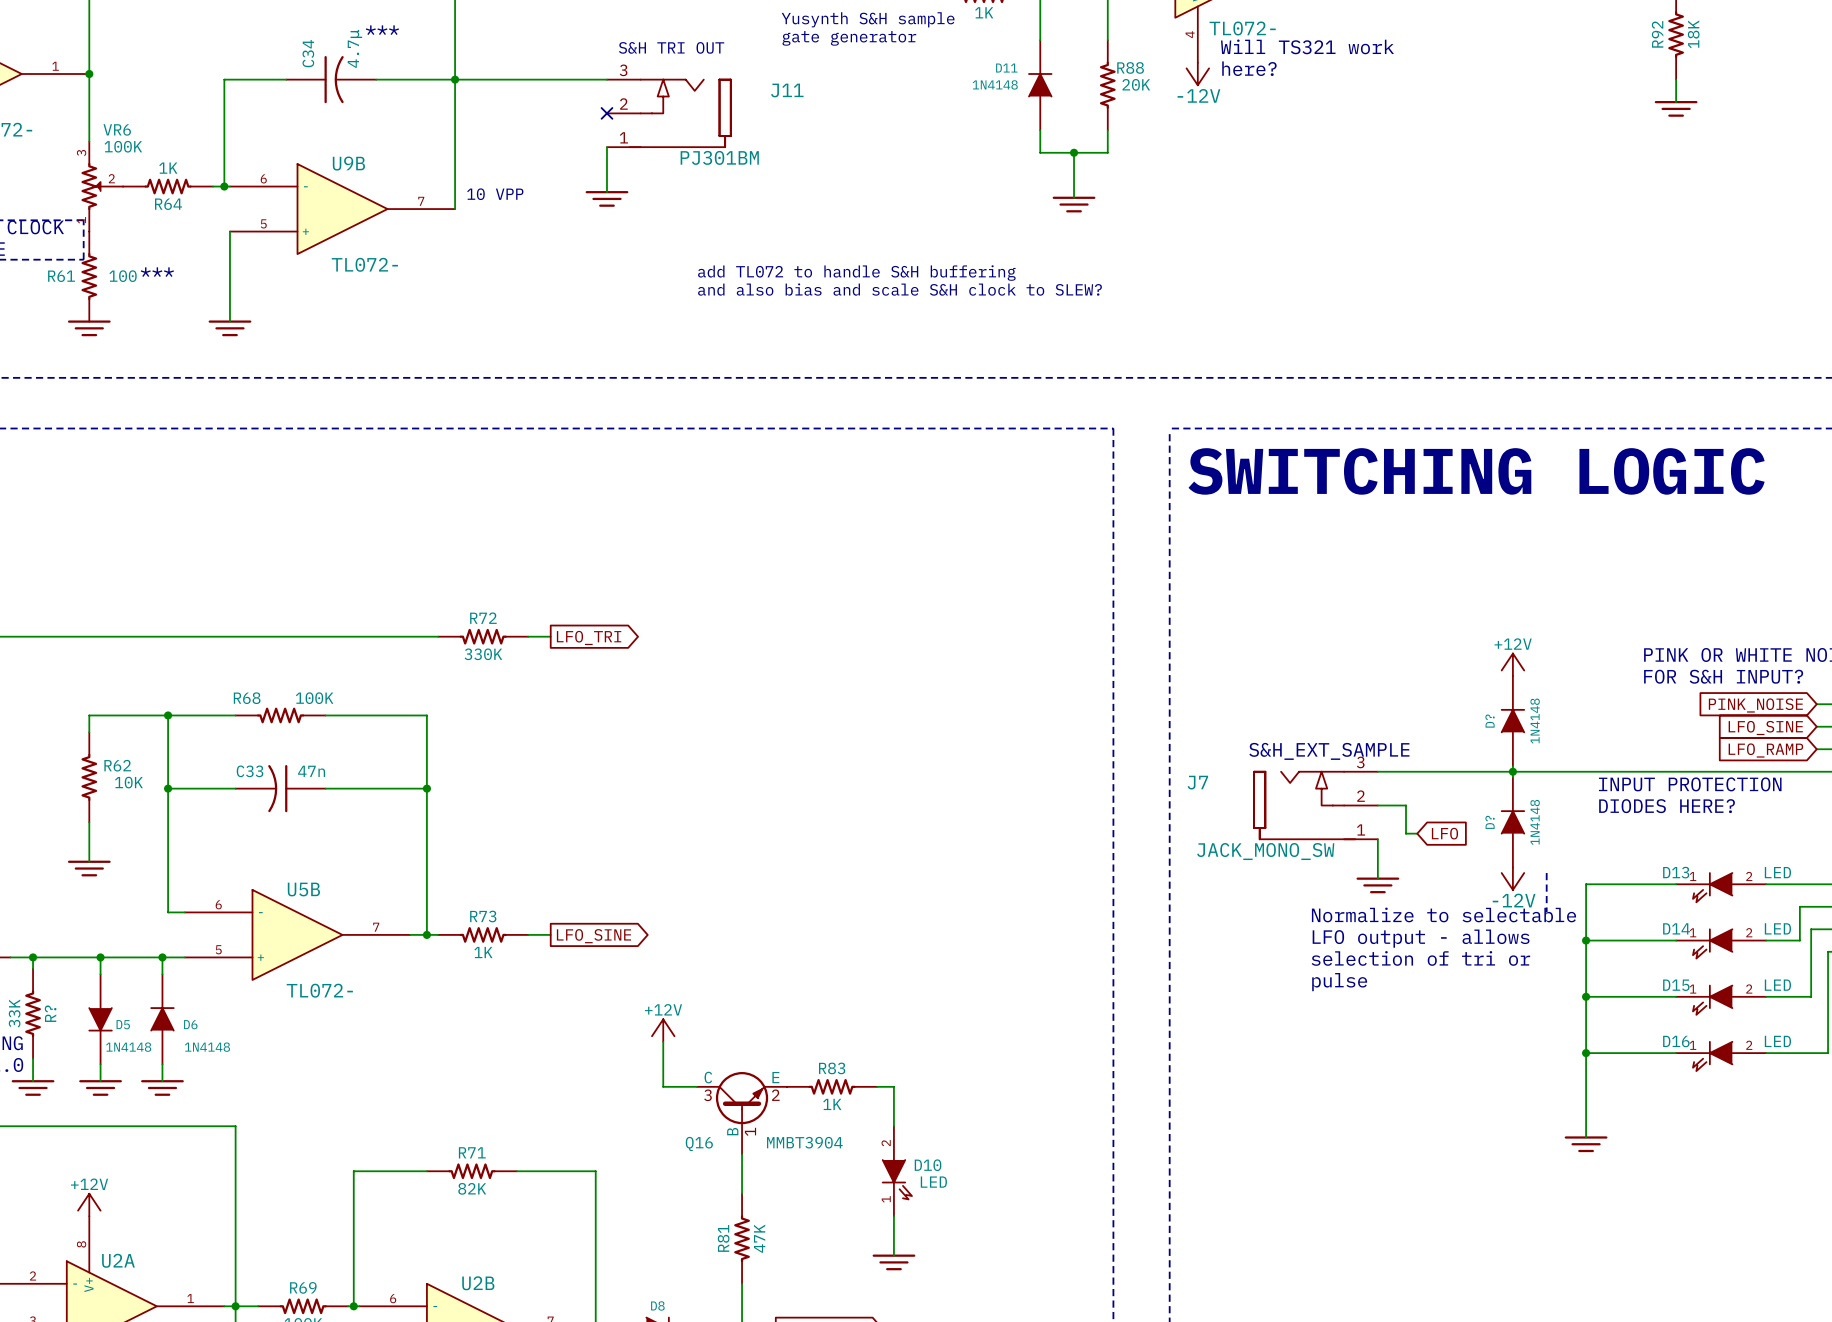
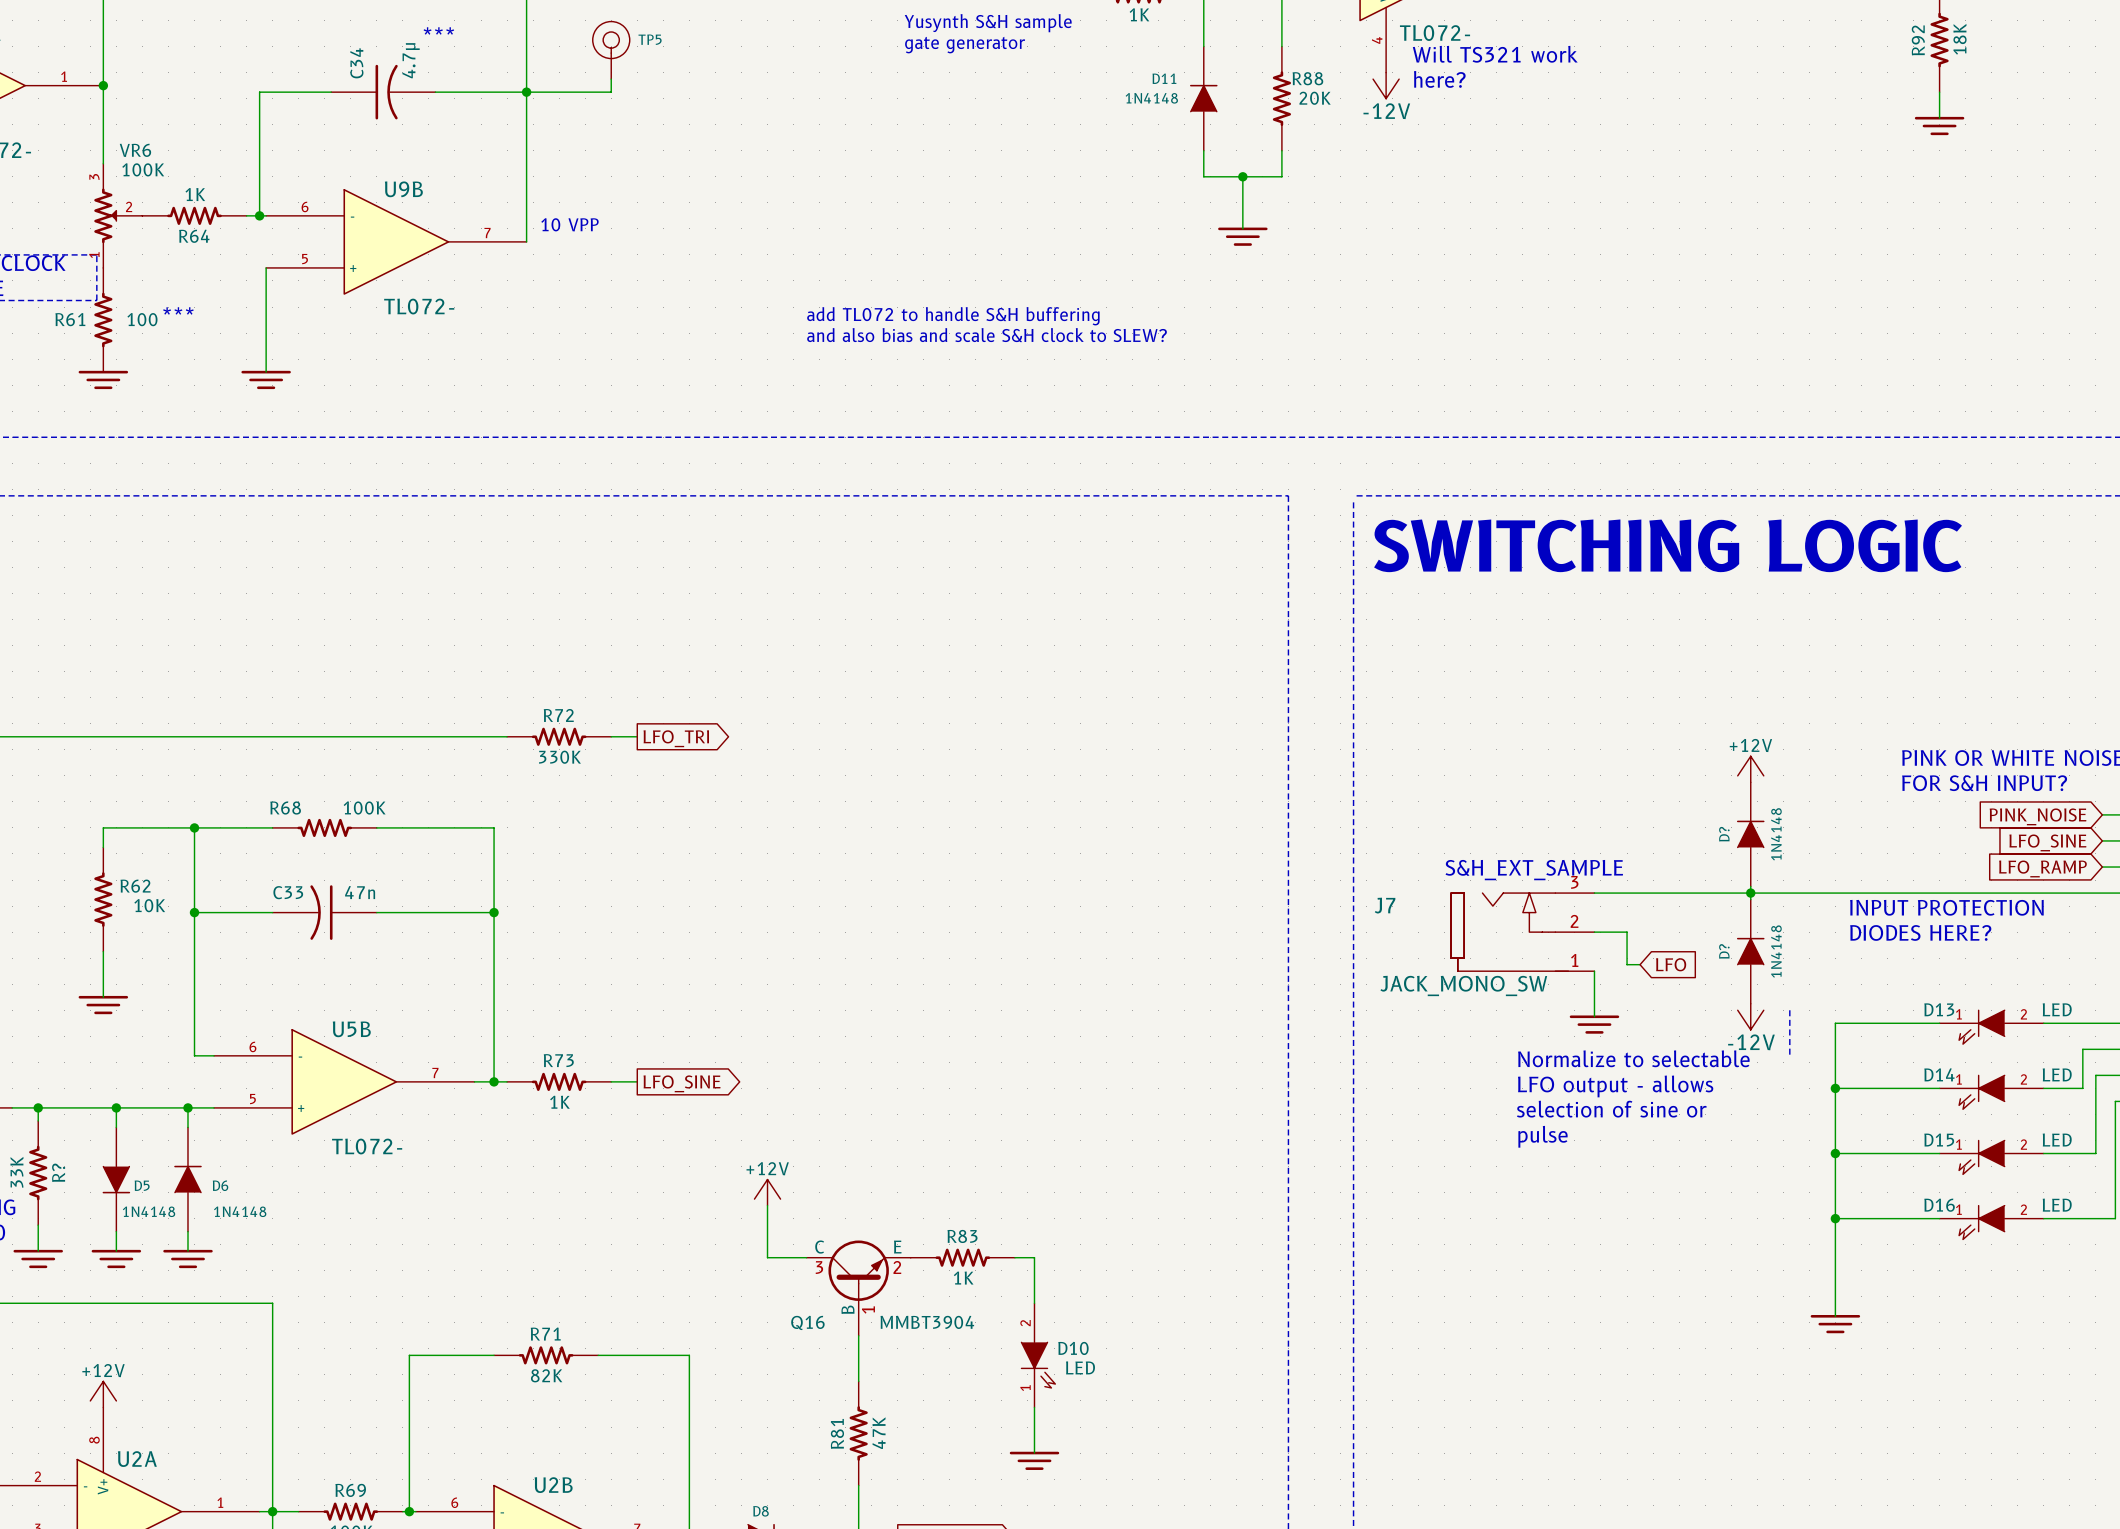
TP5: none -> (611, 50)
text: S&H TRI OUT (671, 47) -> none
wire: (528, 79) (606, 79) -> (611, 92) (611, 79)
no-connect mark: (606, 113) -> none
J11: PJ301BM (668, 113) -> none
wire: (606, 147) (606, 192) -> none
power symbol: (606, 198) -> none
text: selection of tri or (1420, 958) -> selection of sine or (1611, 1109)

